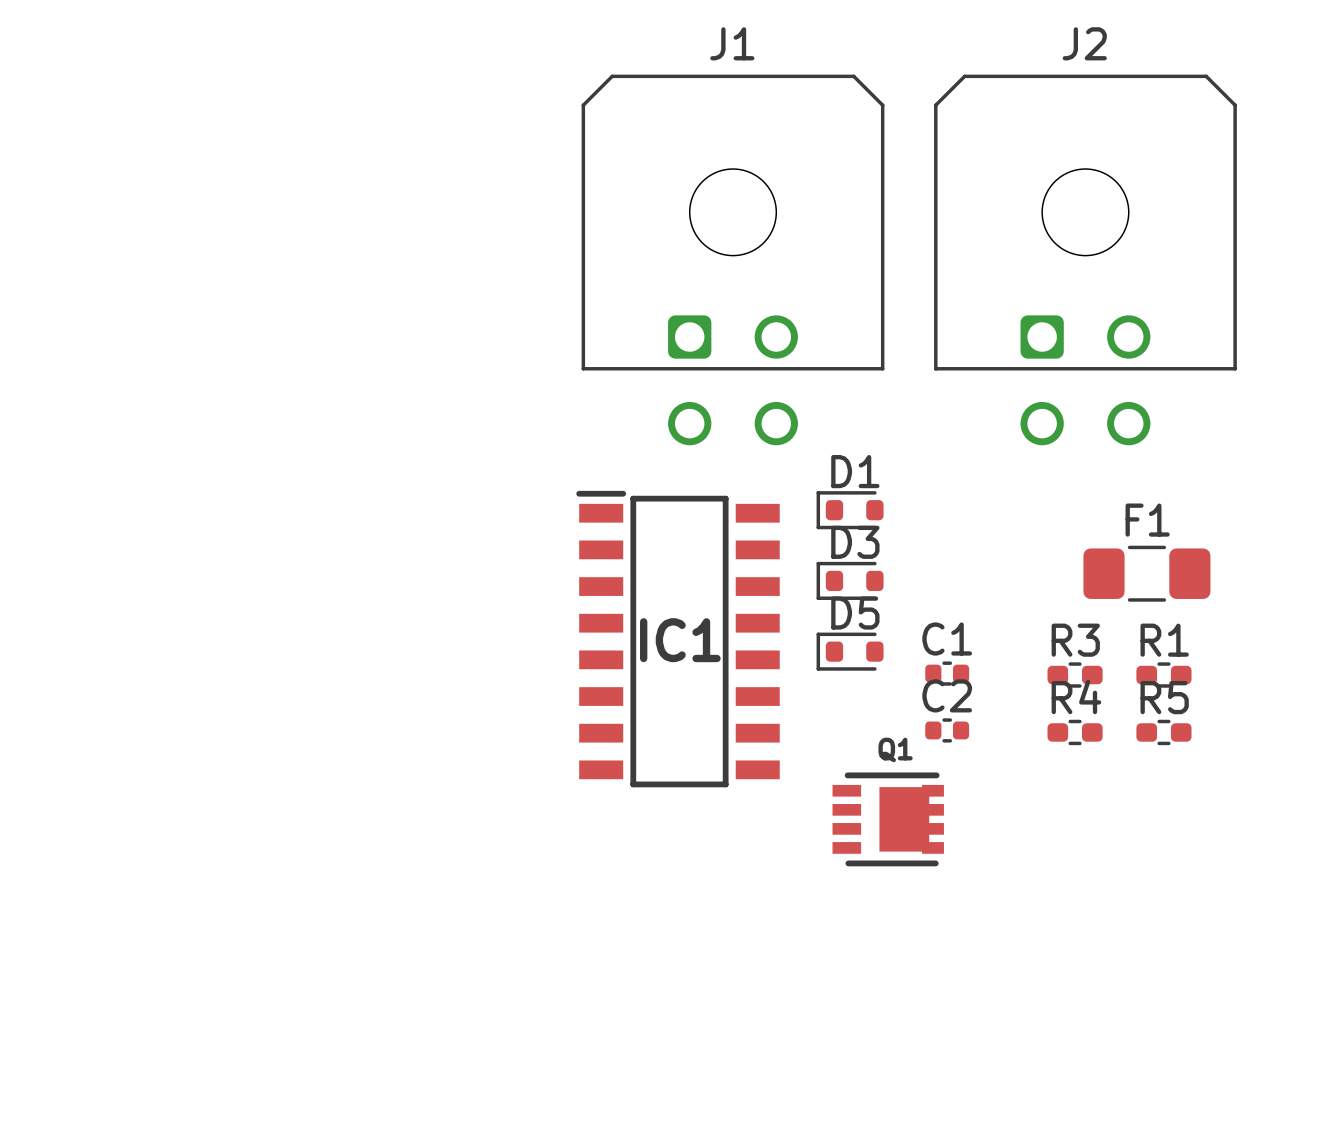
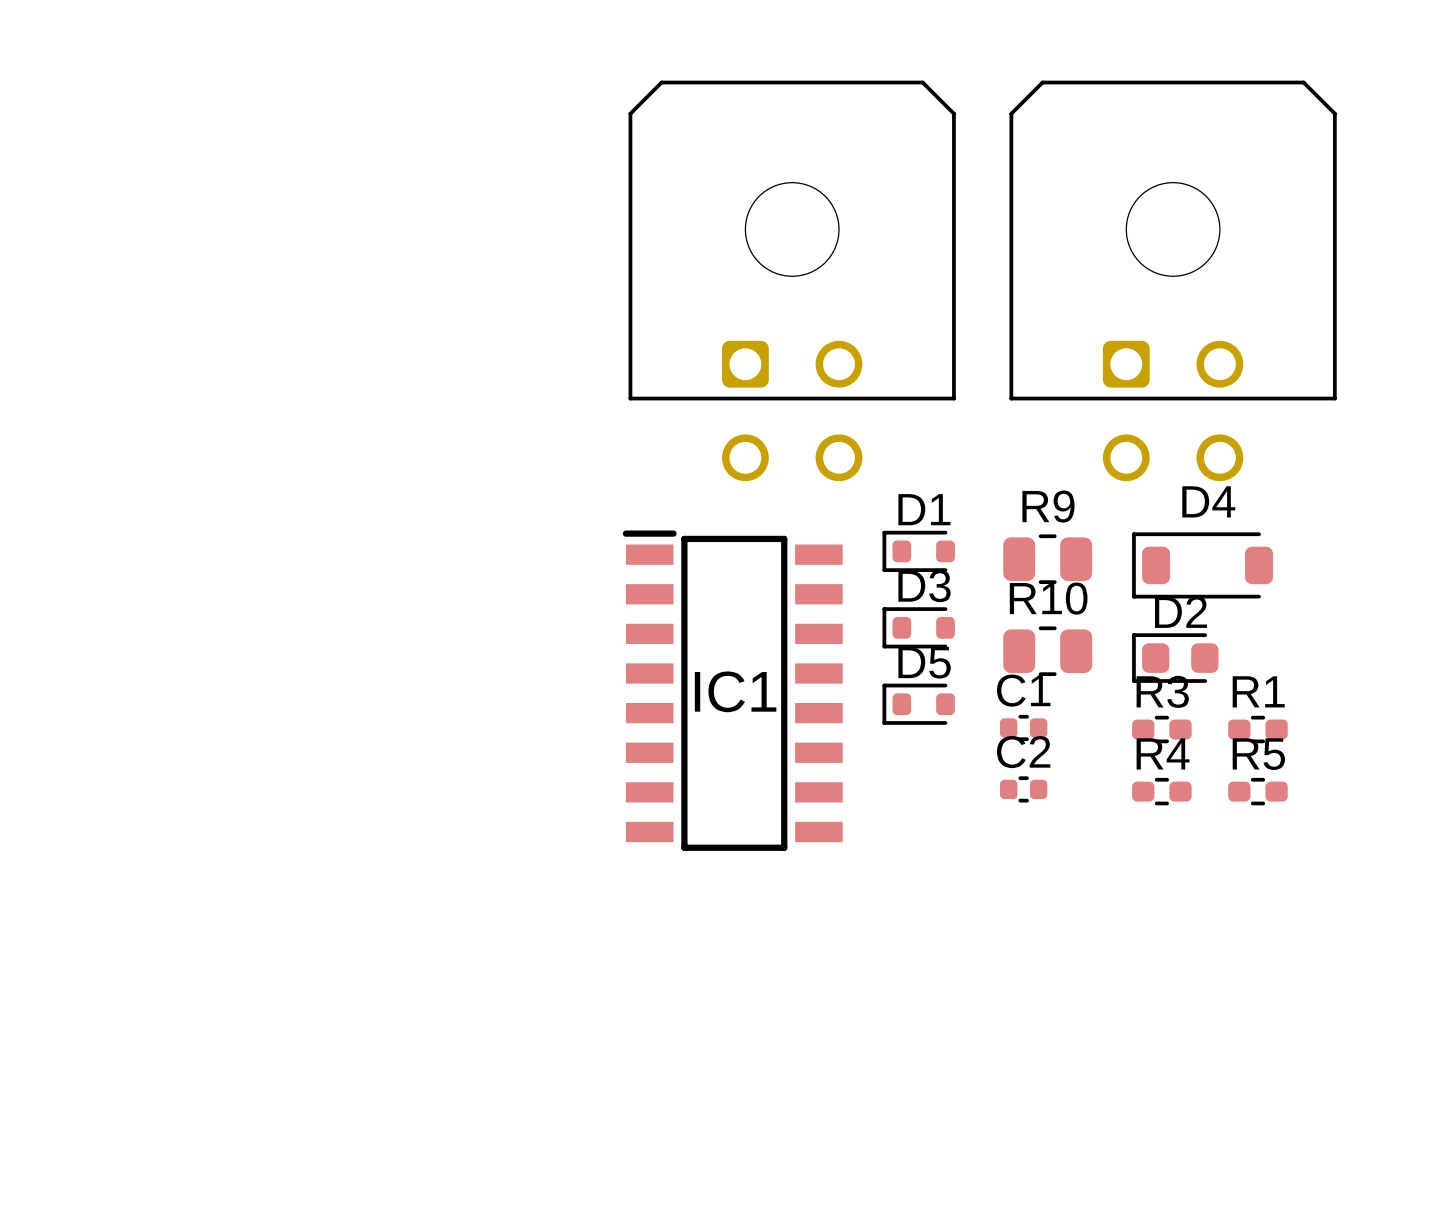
J1 name: J1 (732, 43) -> none
J2 name: J2 (1084, 43) -> none
R9: none -> (1047, 559)
D4: none -> (1202, 565)
F1: (1146, 573) -> none
R10: none -> (1047, 651)
D2: none -> (1175, 658)
Q1: (888, 819) -> none

